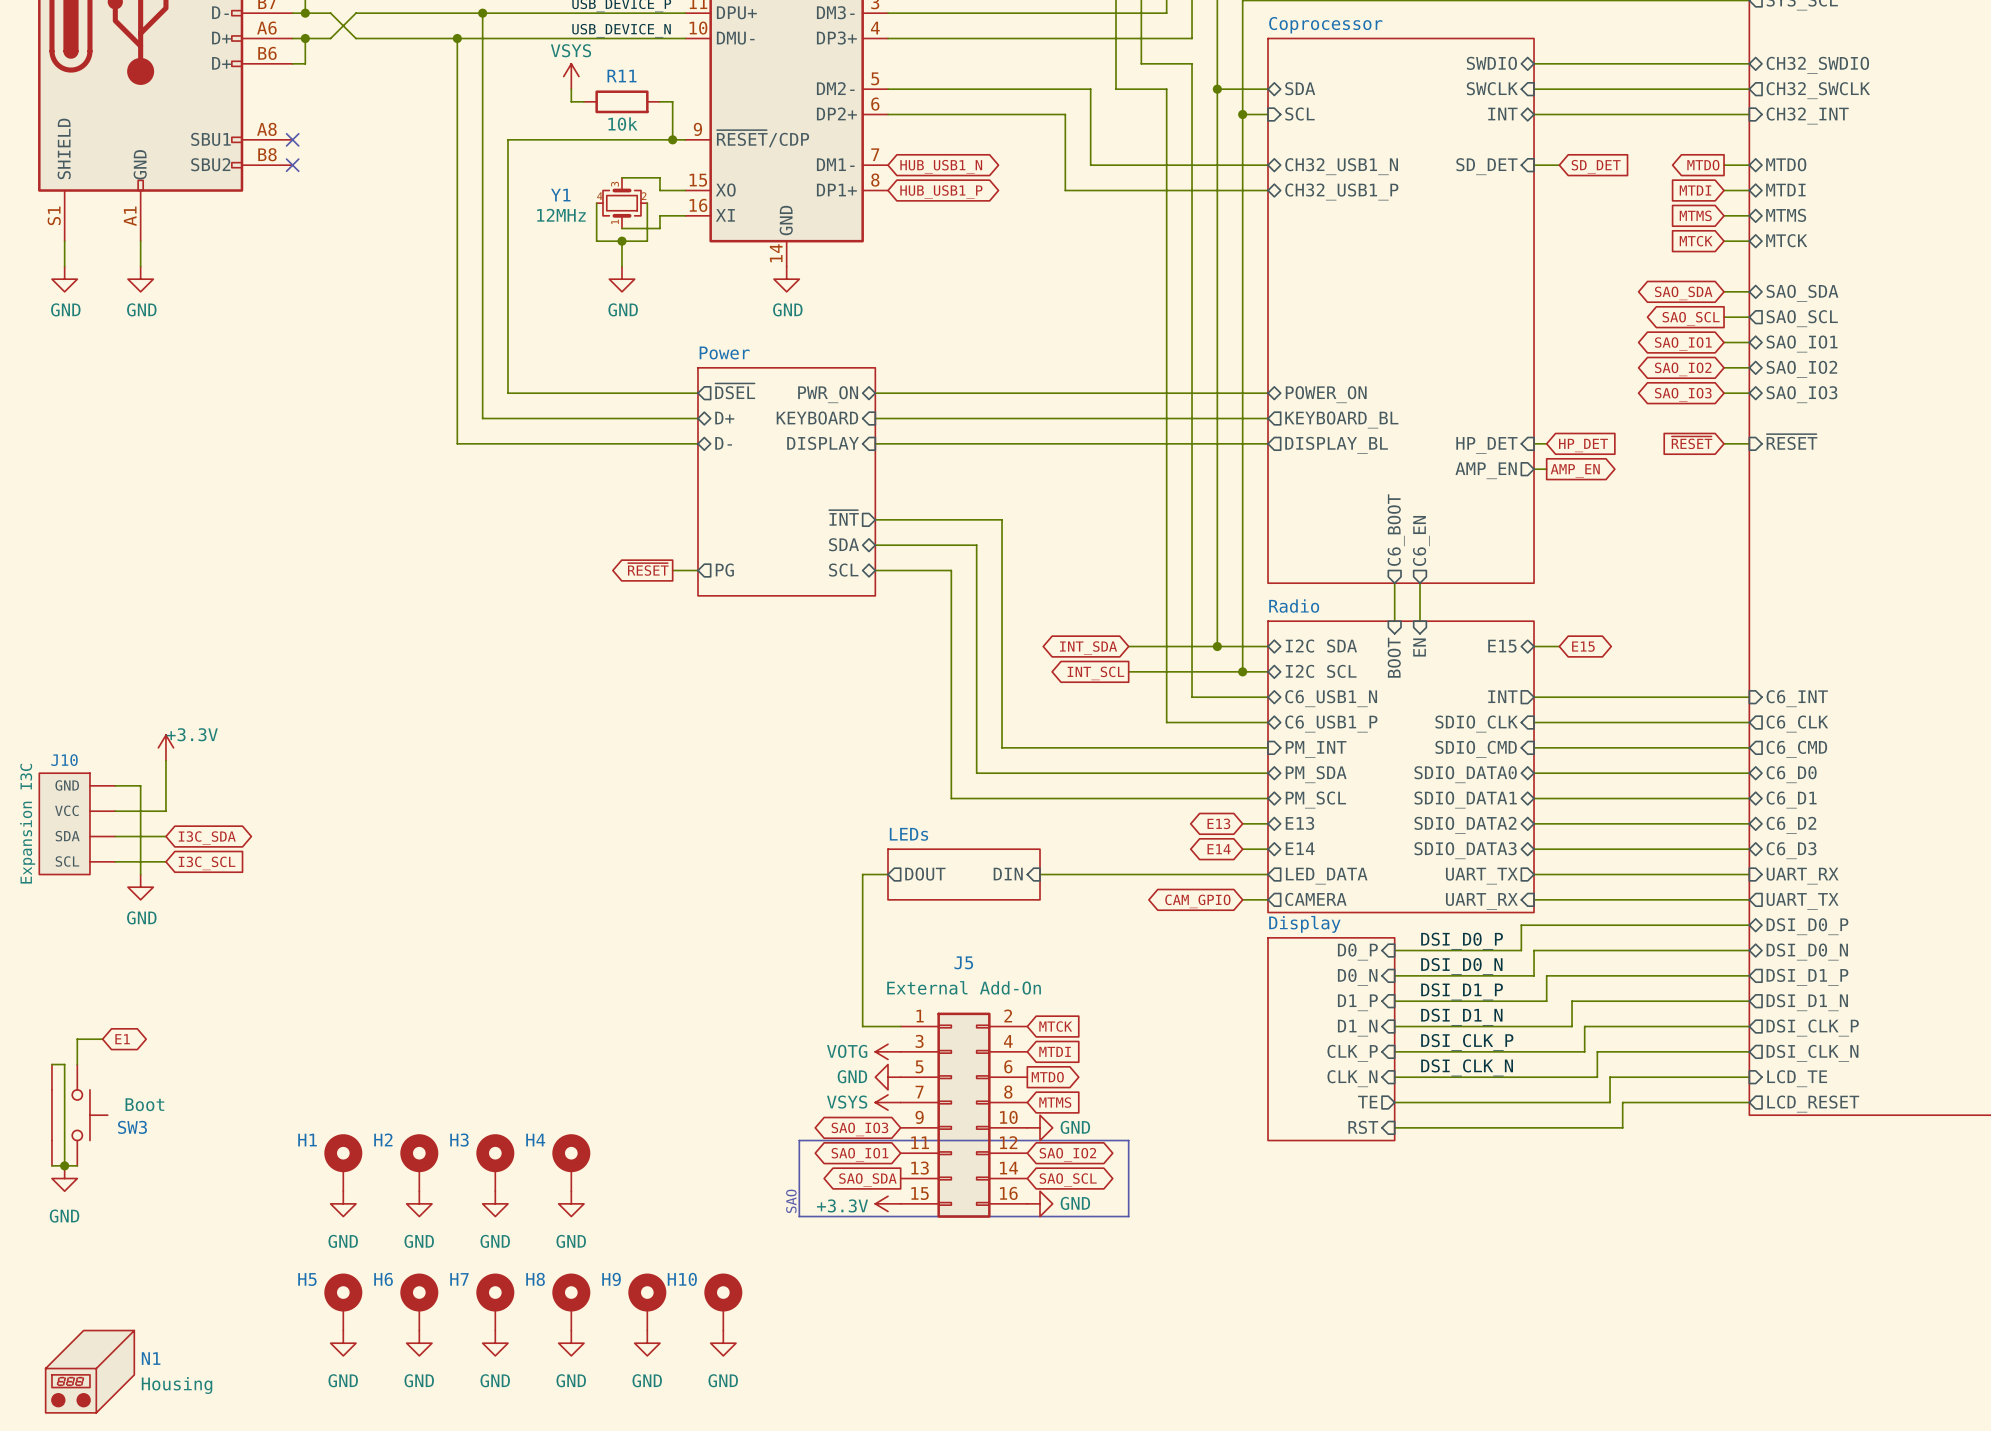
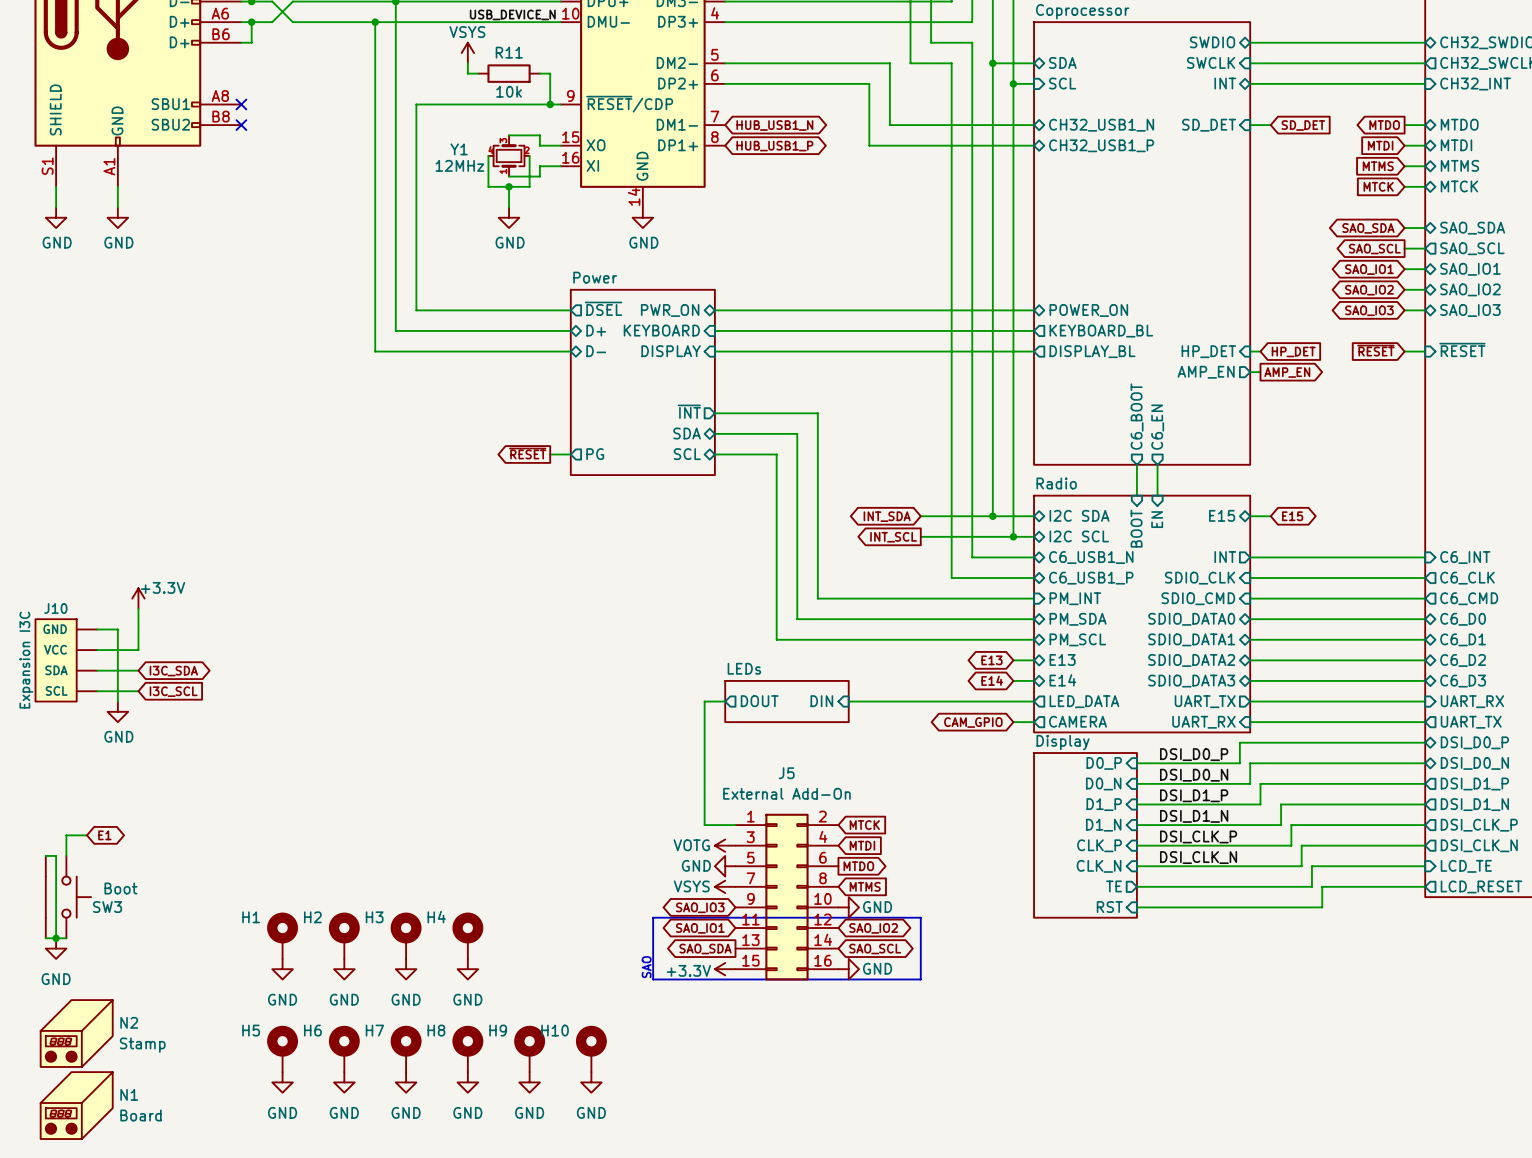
N2: none -> Stamp (76, 1033)
N1 value: Housing (177, 1385) -> Board (140, 1115)

